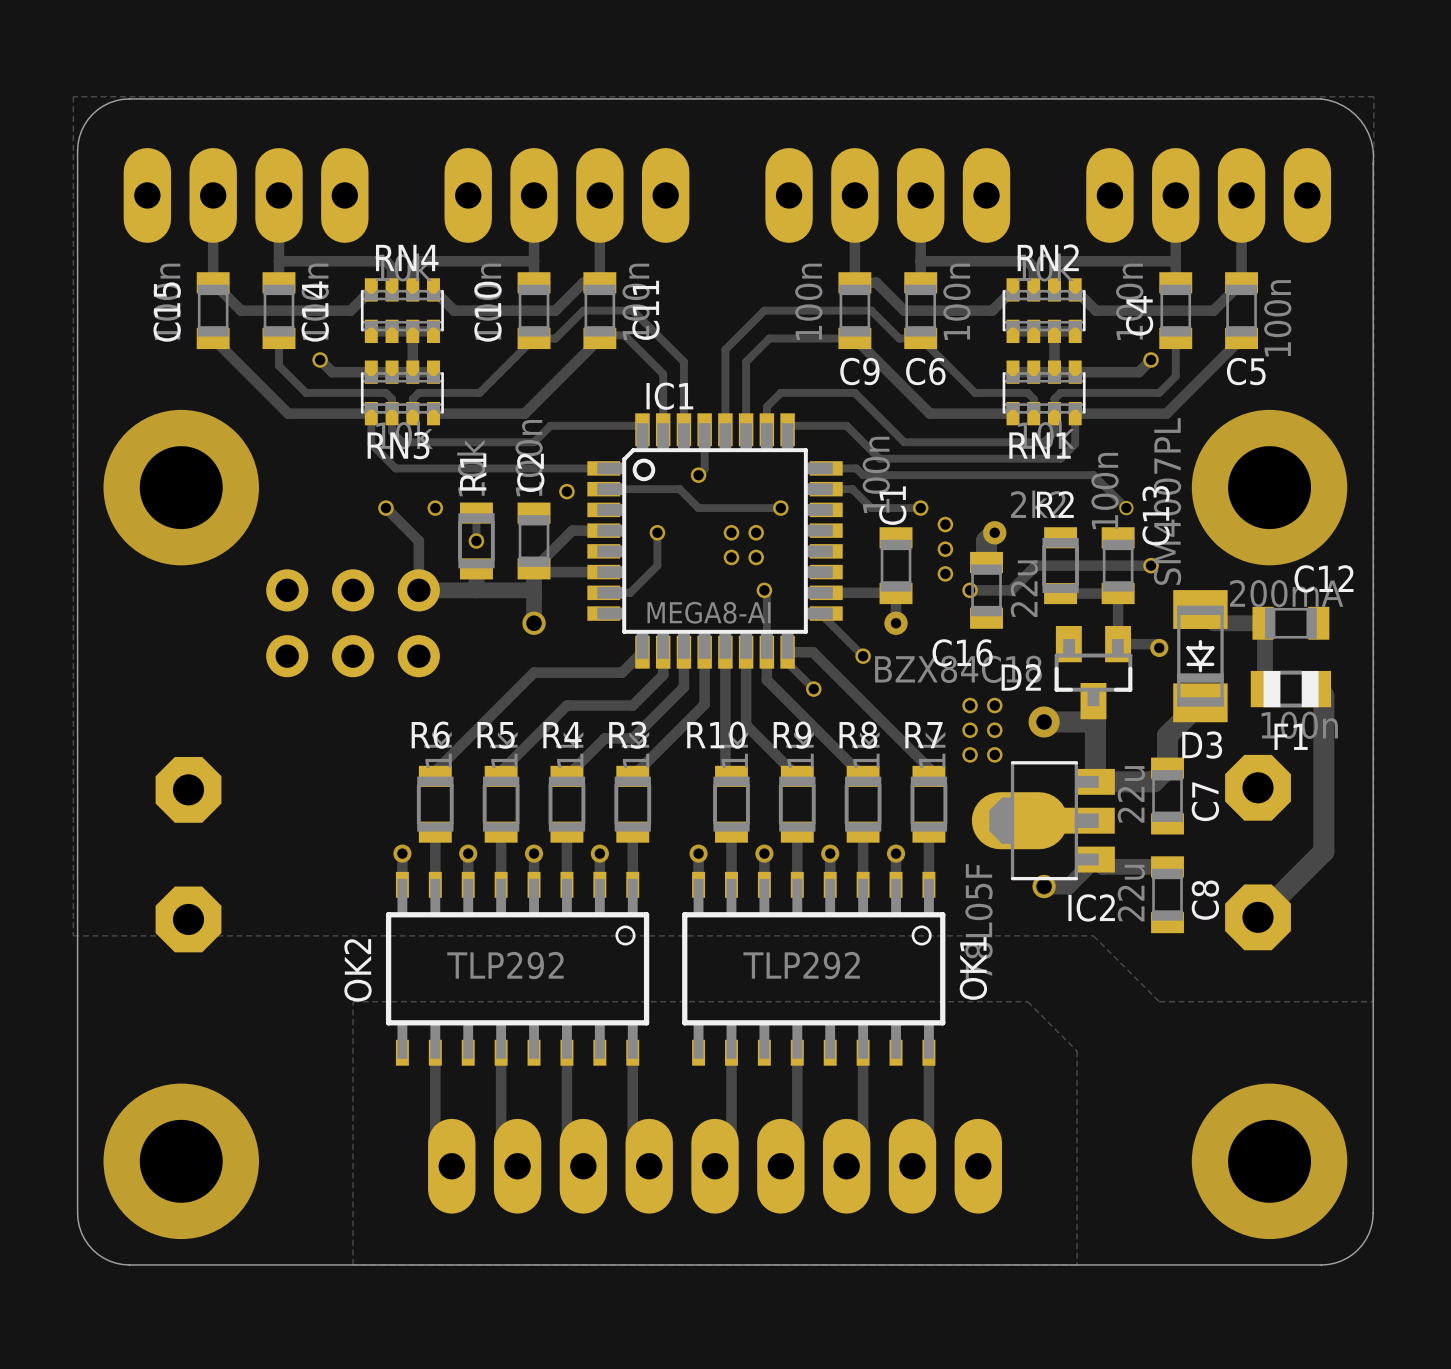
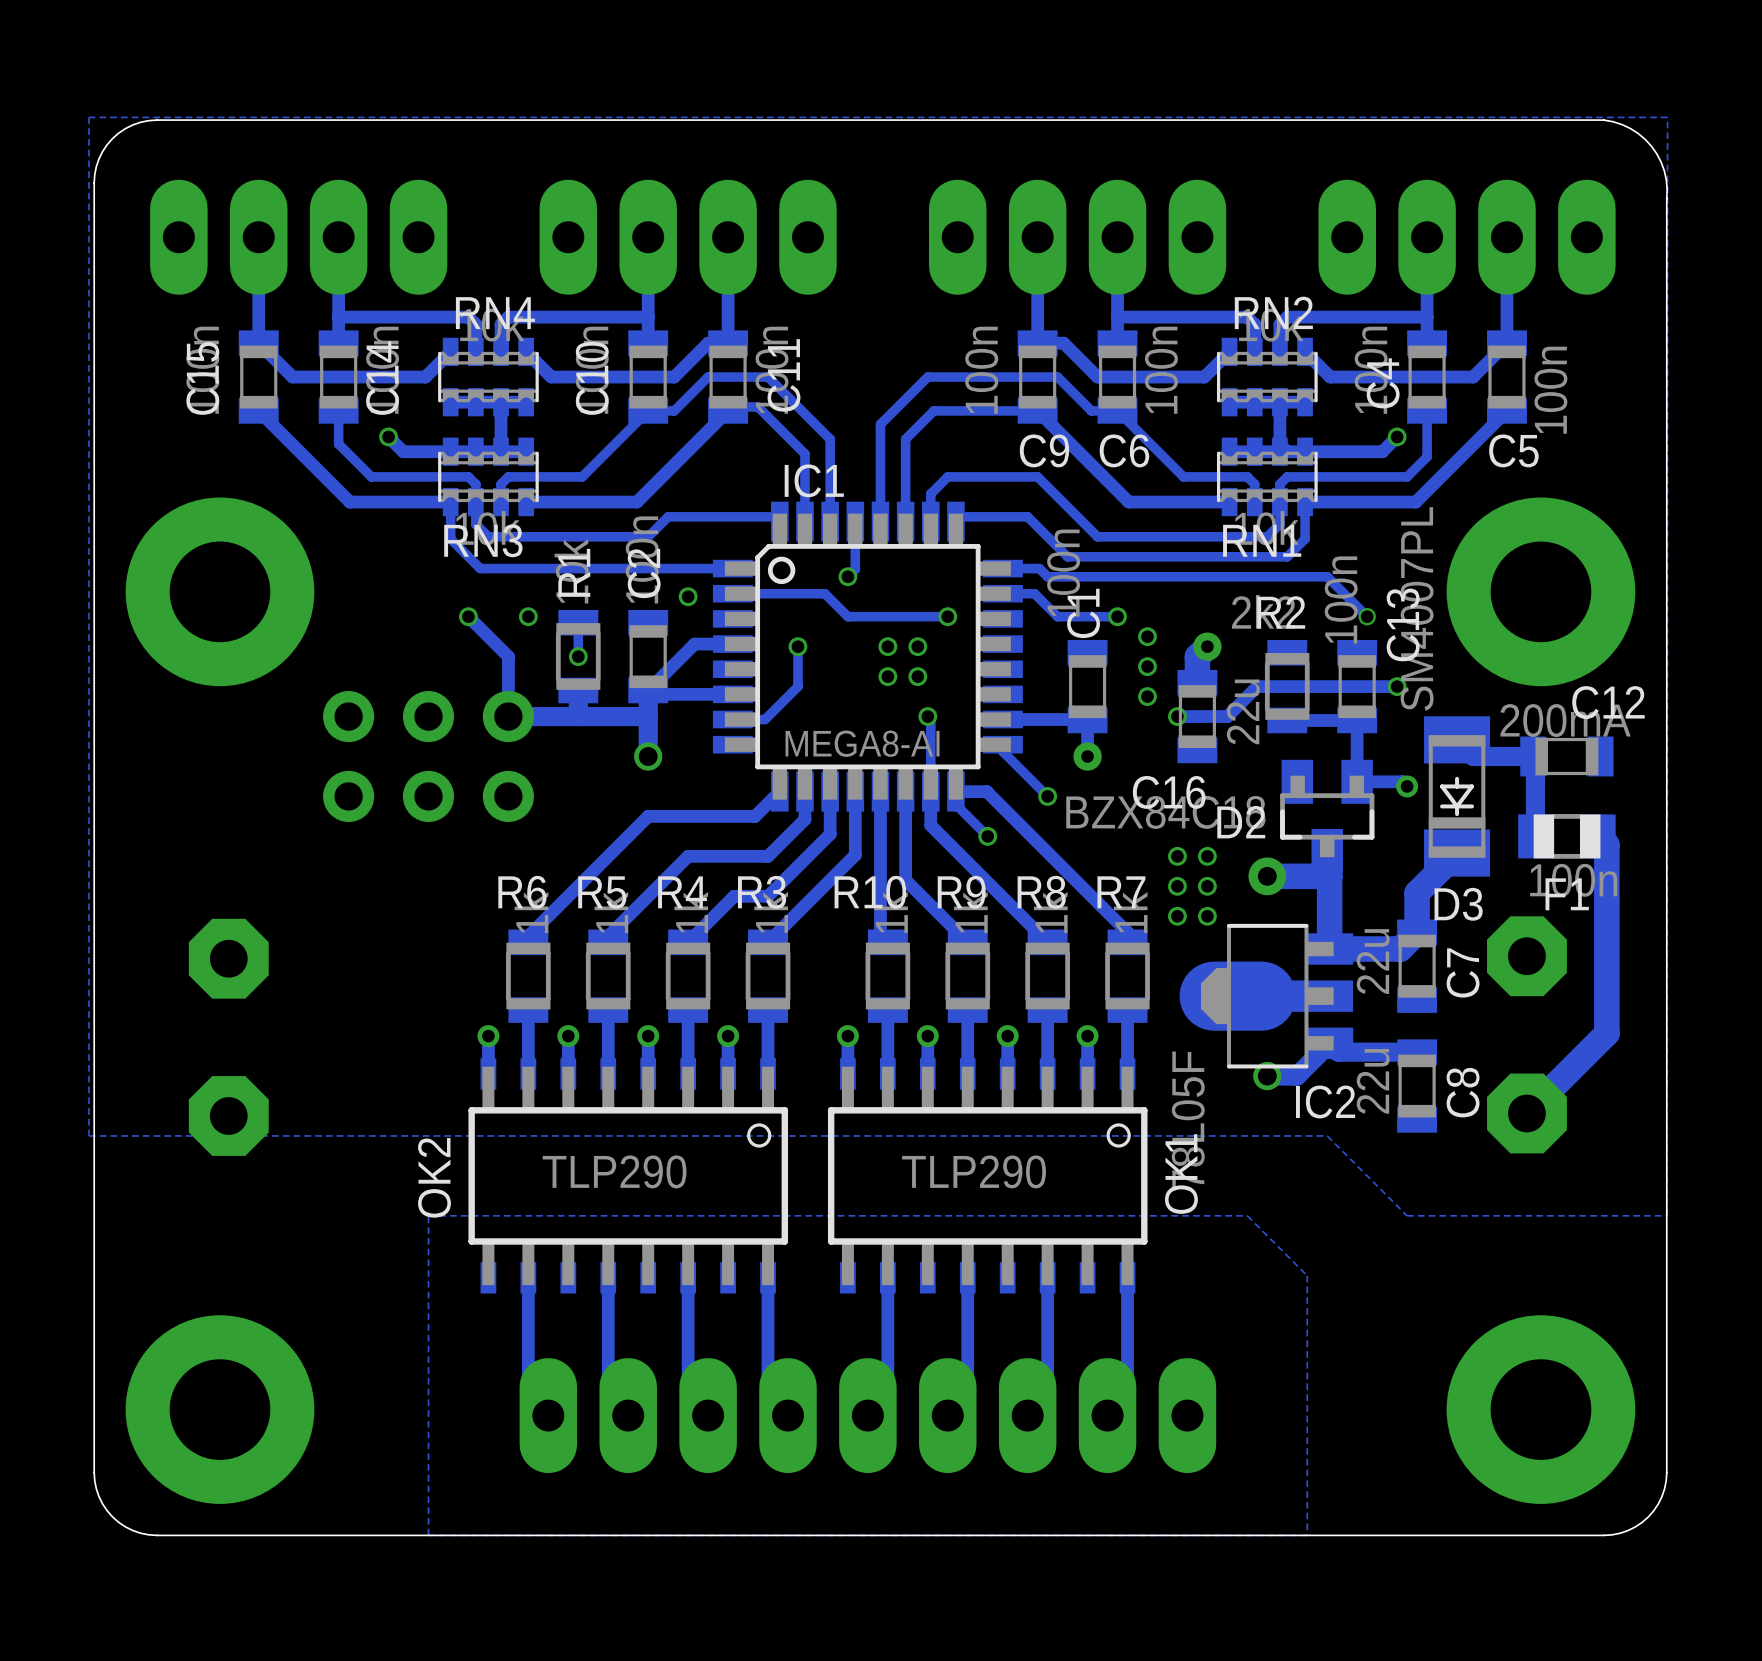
OK2 value: TLP292 (505, 965) -> TLP290 (614, 1171)
OK1 value: TLP292 (801, 965) -> TLP290 (974, 1171)

